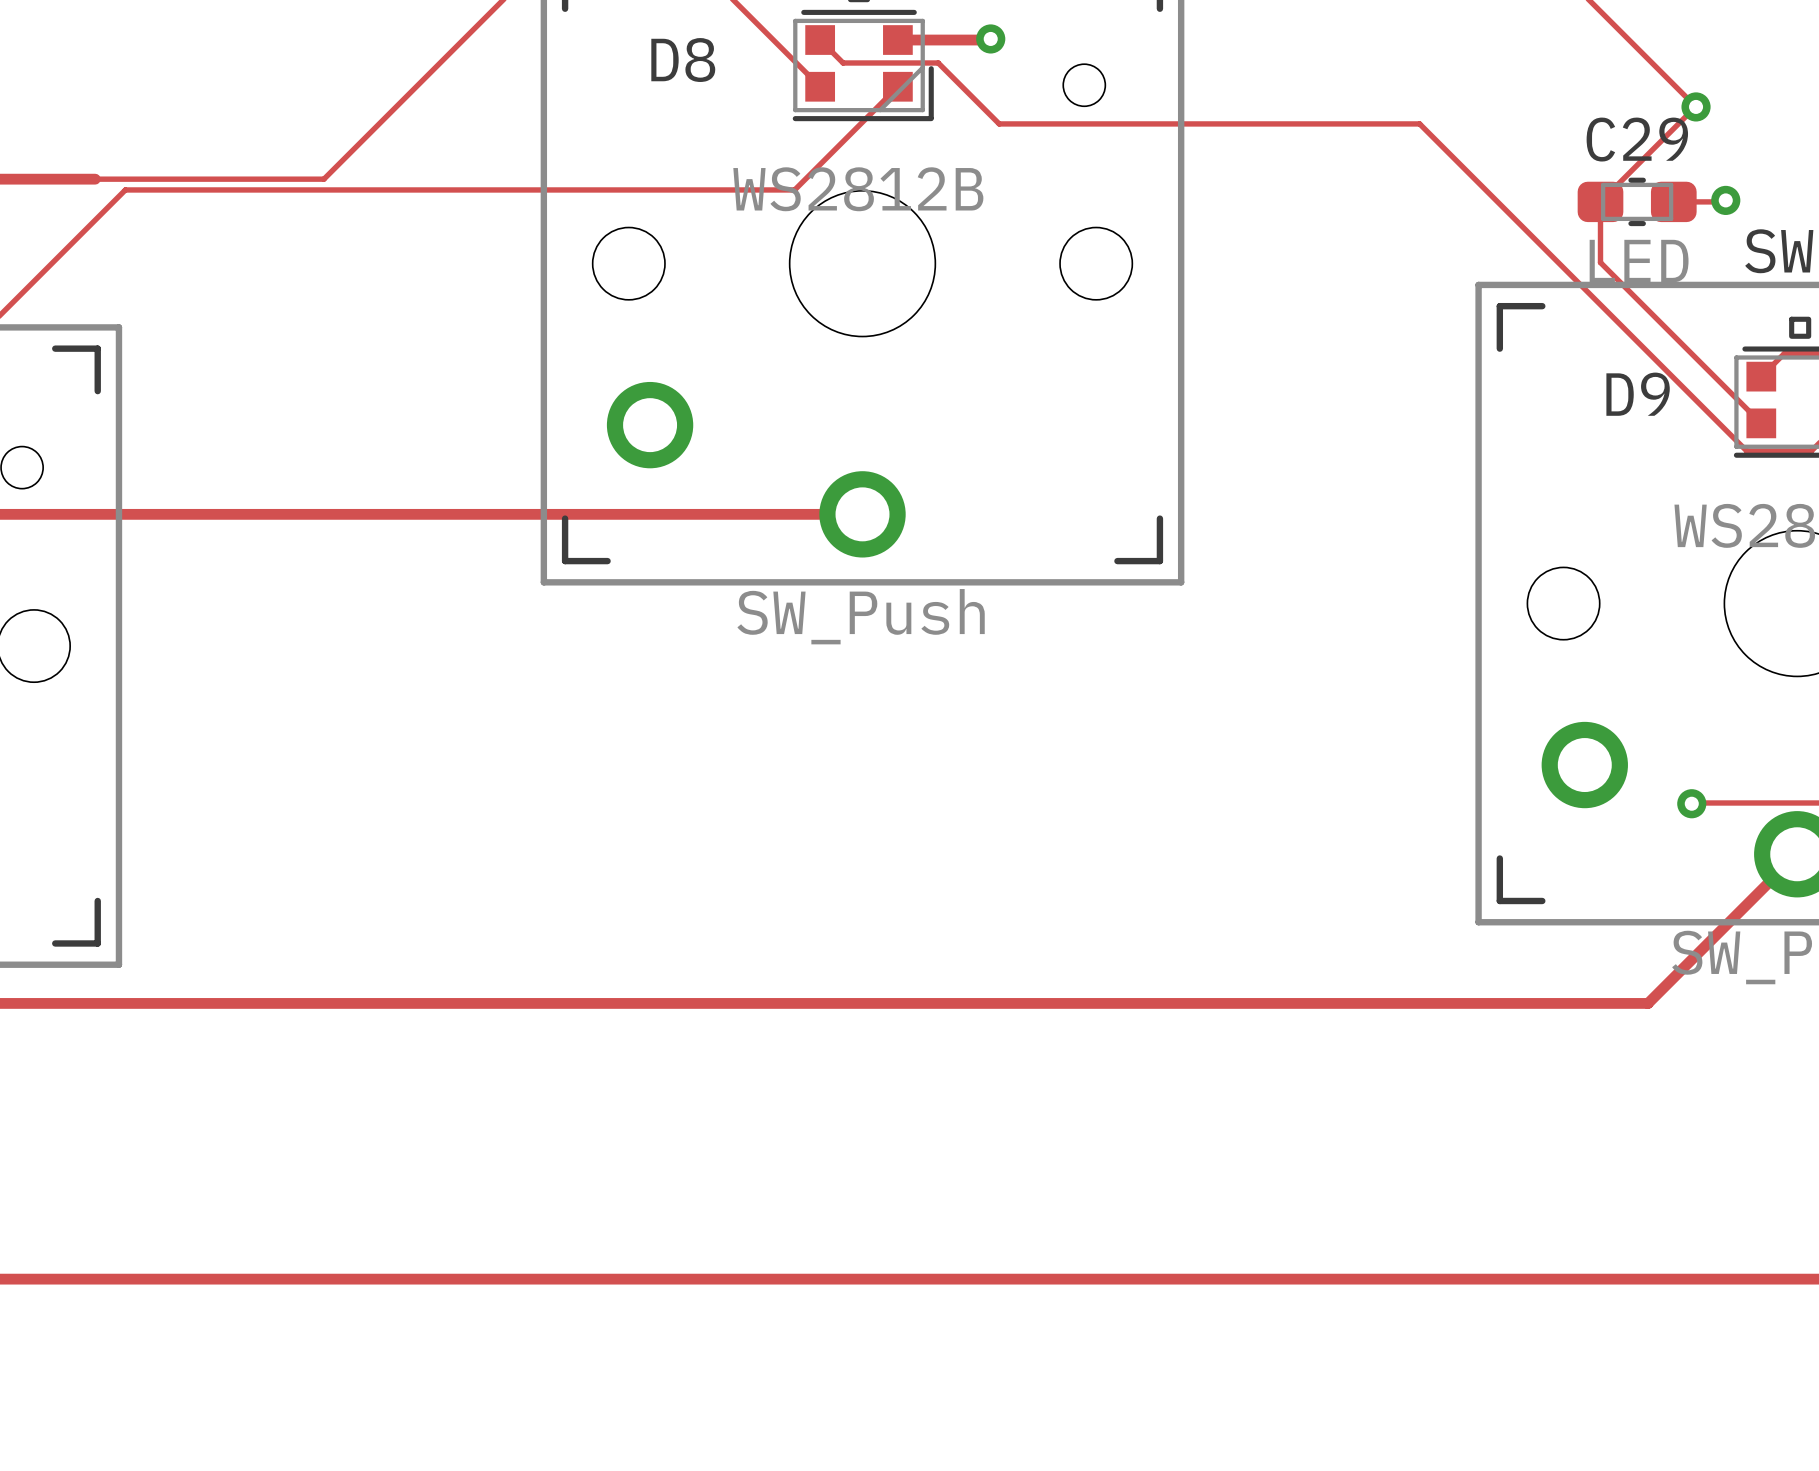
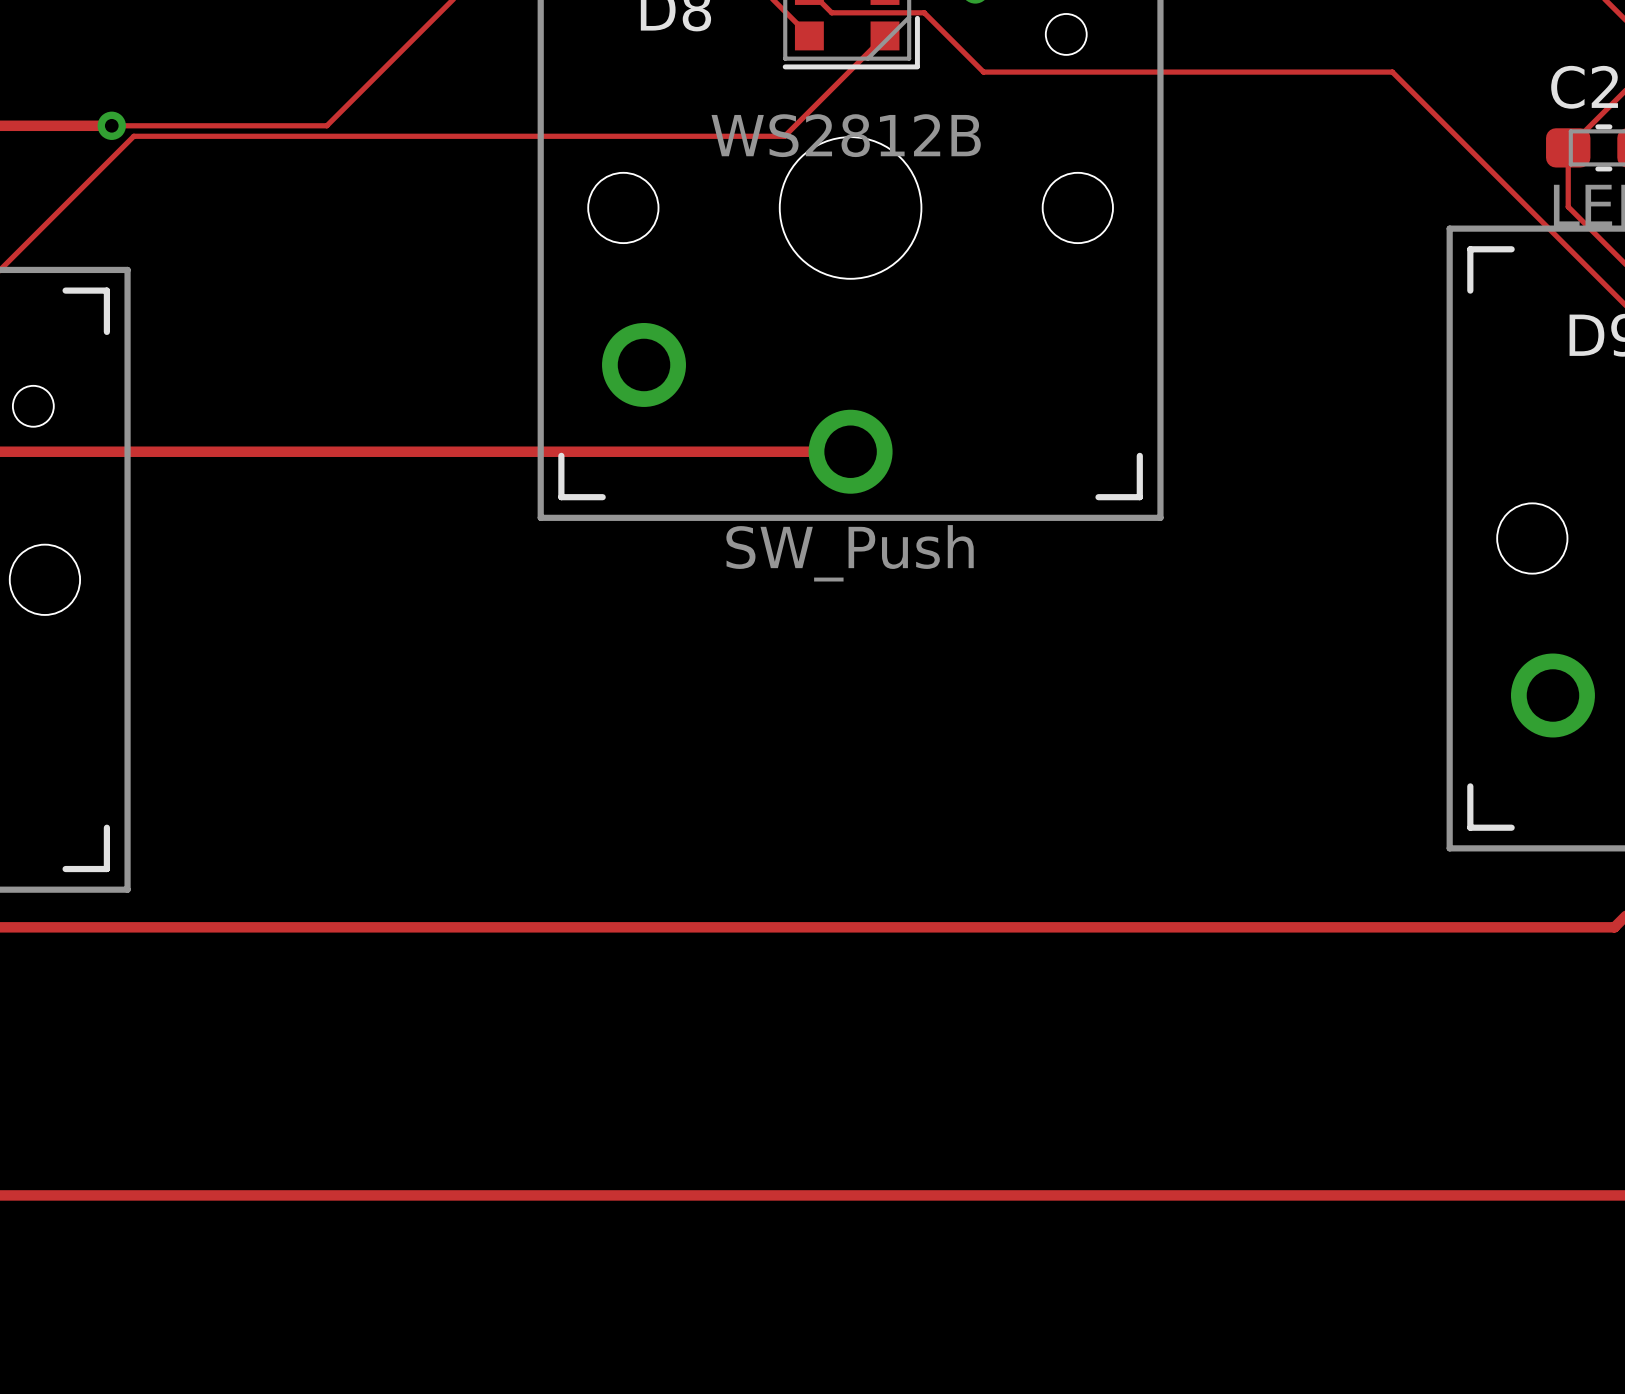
via: none -> (111, 125)

